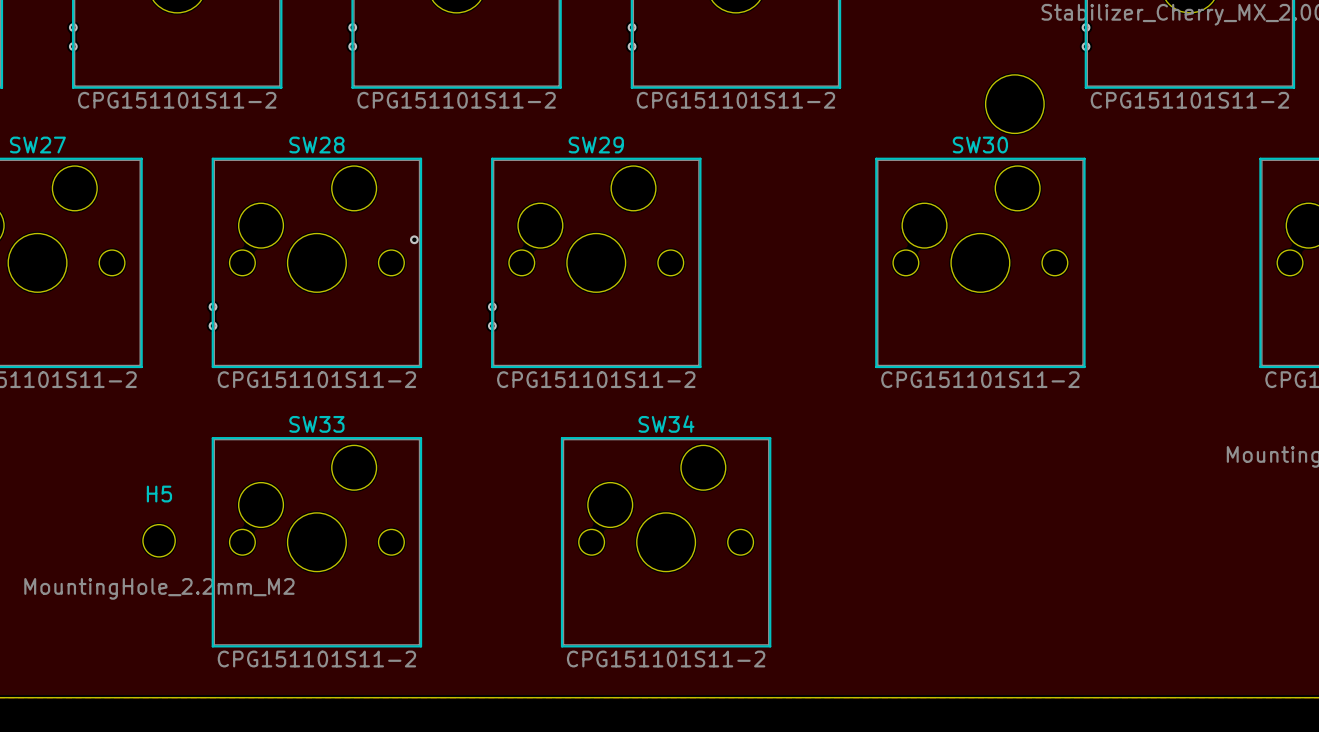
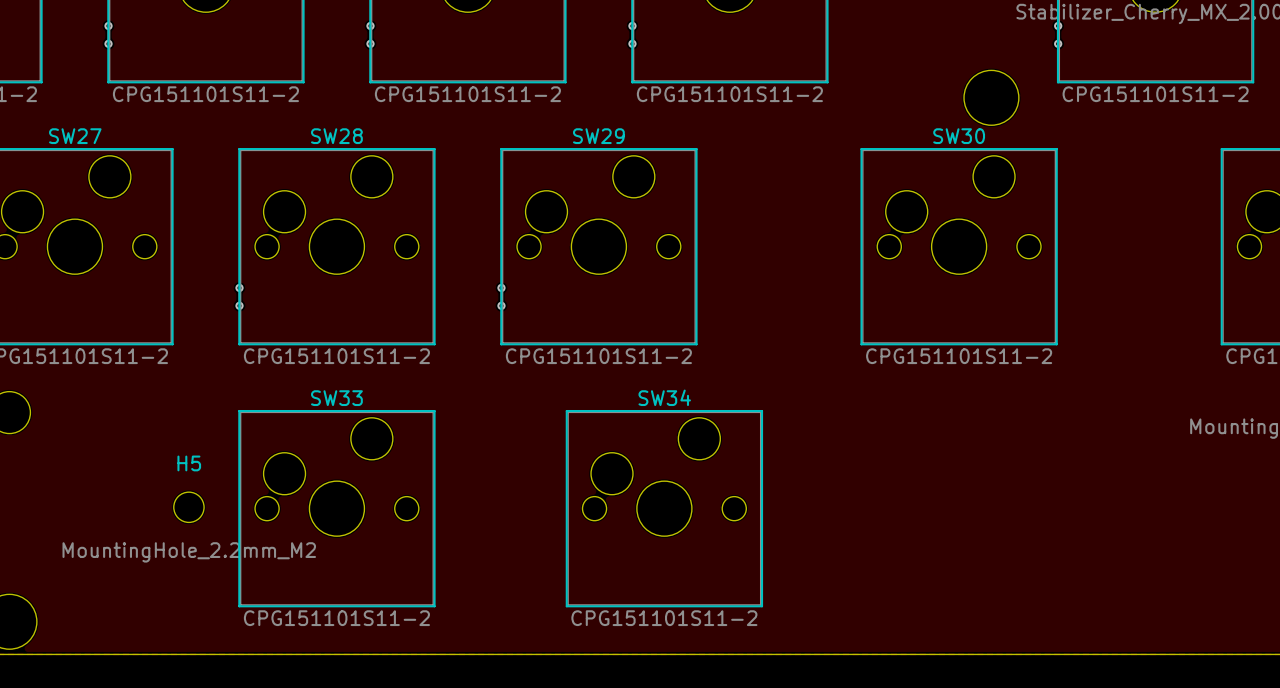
via: (414, 239) -> none

